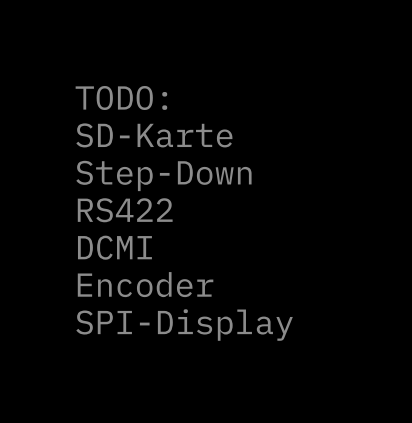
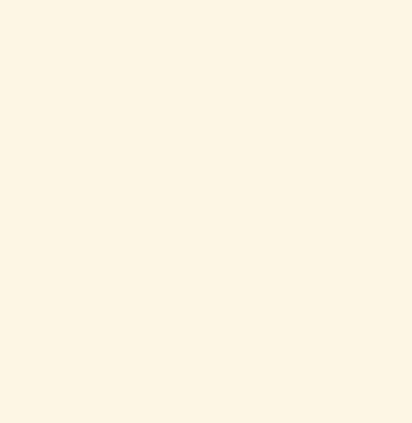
text: TODO: (121, 97) -> none
text: SD-Karte (154, 135) -> none
text: Step-Down (163, 175) -> none
text: RS422 (125, 210) -> none
text: DCMI (114, 247) -> none
text: Encoder (145, 284) -> none
text: SPI-Display (184, 325) -> none

